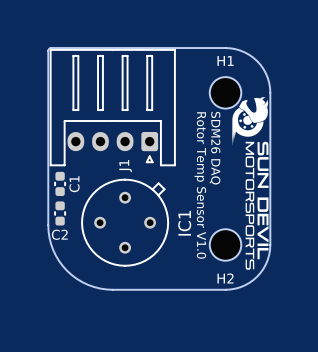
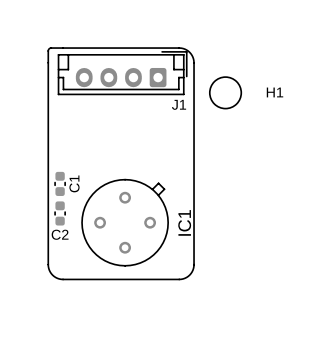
board edge: (179, 48) (225, 48) (240, 50) (257, 61) (267, 78) (270, 92) (270, 244) (267, 259) (260, 272) (249, 282) (230, 289) (100, 288) (76, 278) (62, 266) (53, 249) (48, 225) -> (179, 48) (189, 52) (194, 62) (194, 264) (190, 273) (179, 279) (59, 278) (52, 275) (48, 268) (48, 225)
J1 footprint: [50, 49, 176, 166] -> [57, 51, 188, 96]
H1 name position: H1 (225, 60) -> H1 (275, 92)
drawing: [232, 97, 269, 270] -> none
text: SDM26 DAQ (215, 148) -> none
J1 name position: J1 (125, 166) -> J1 (179, 104)
text: Rotor Temp Sensor V1.0 (200, 185) -> none
H2: (225, 244) -> none

